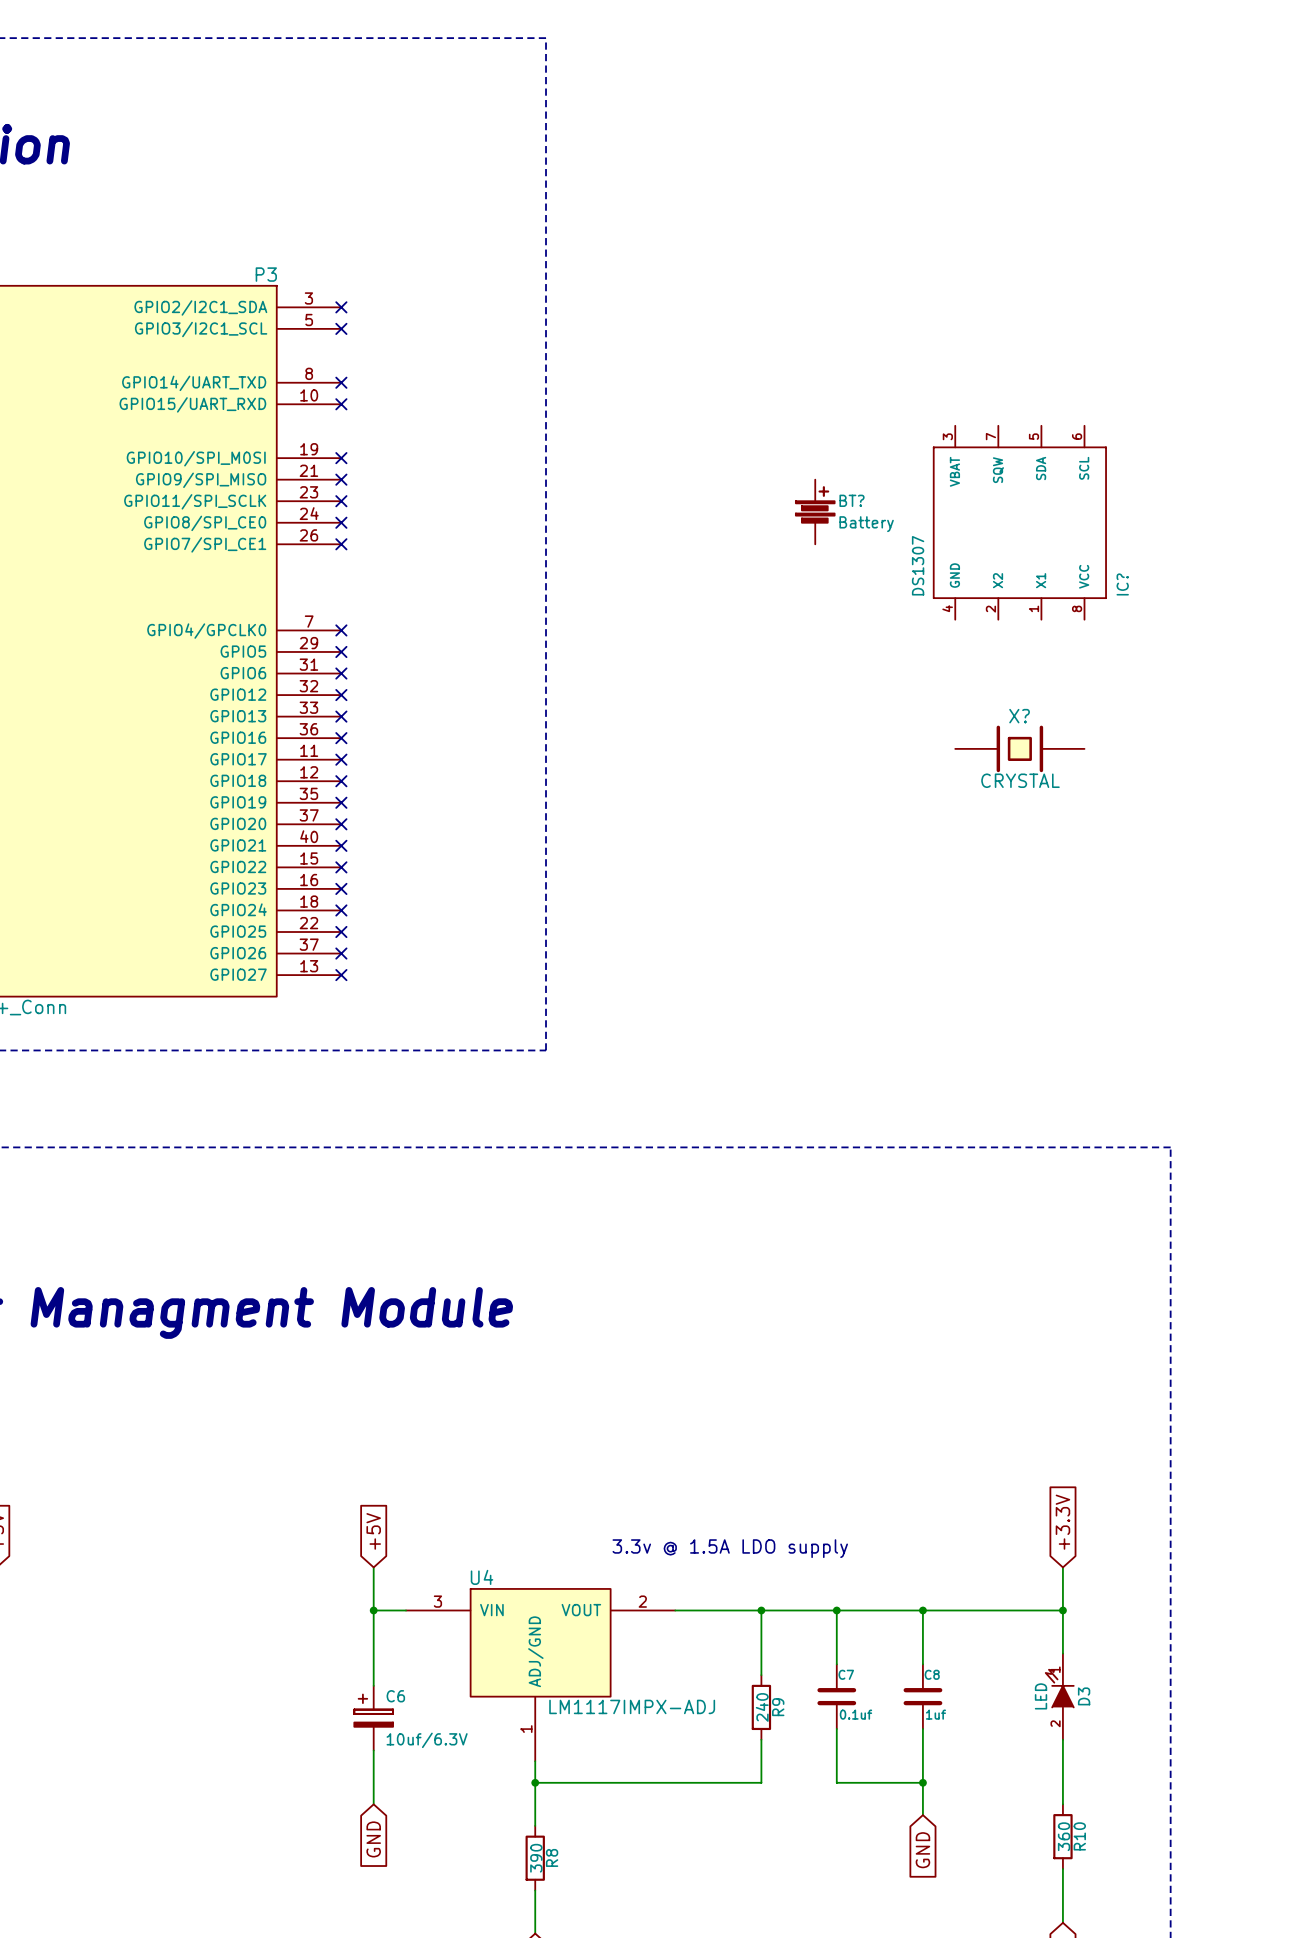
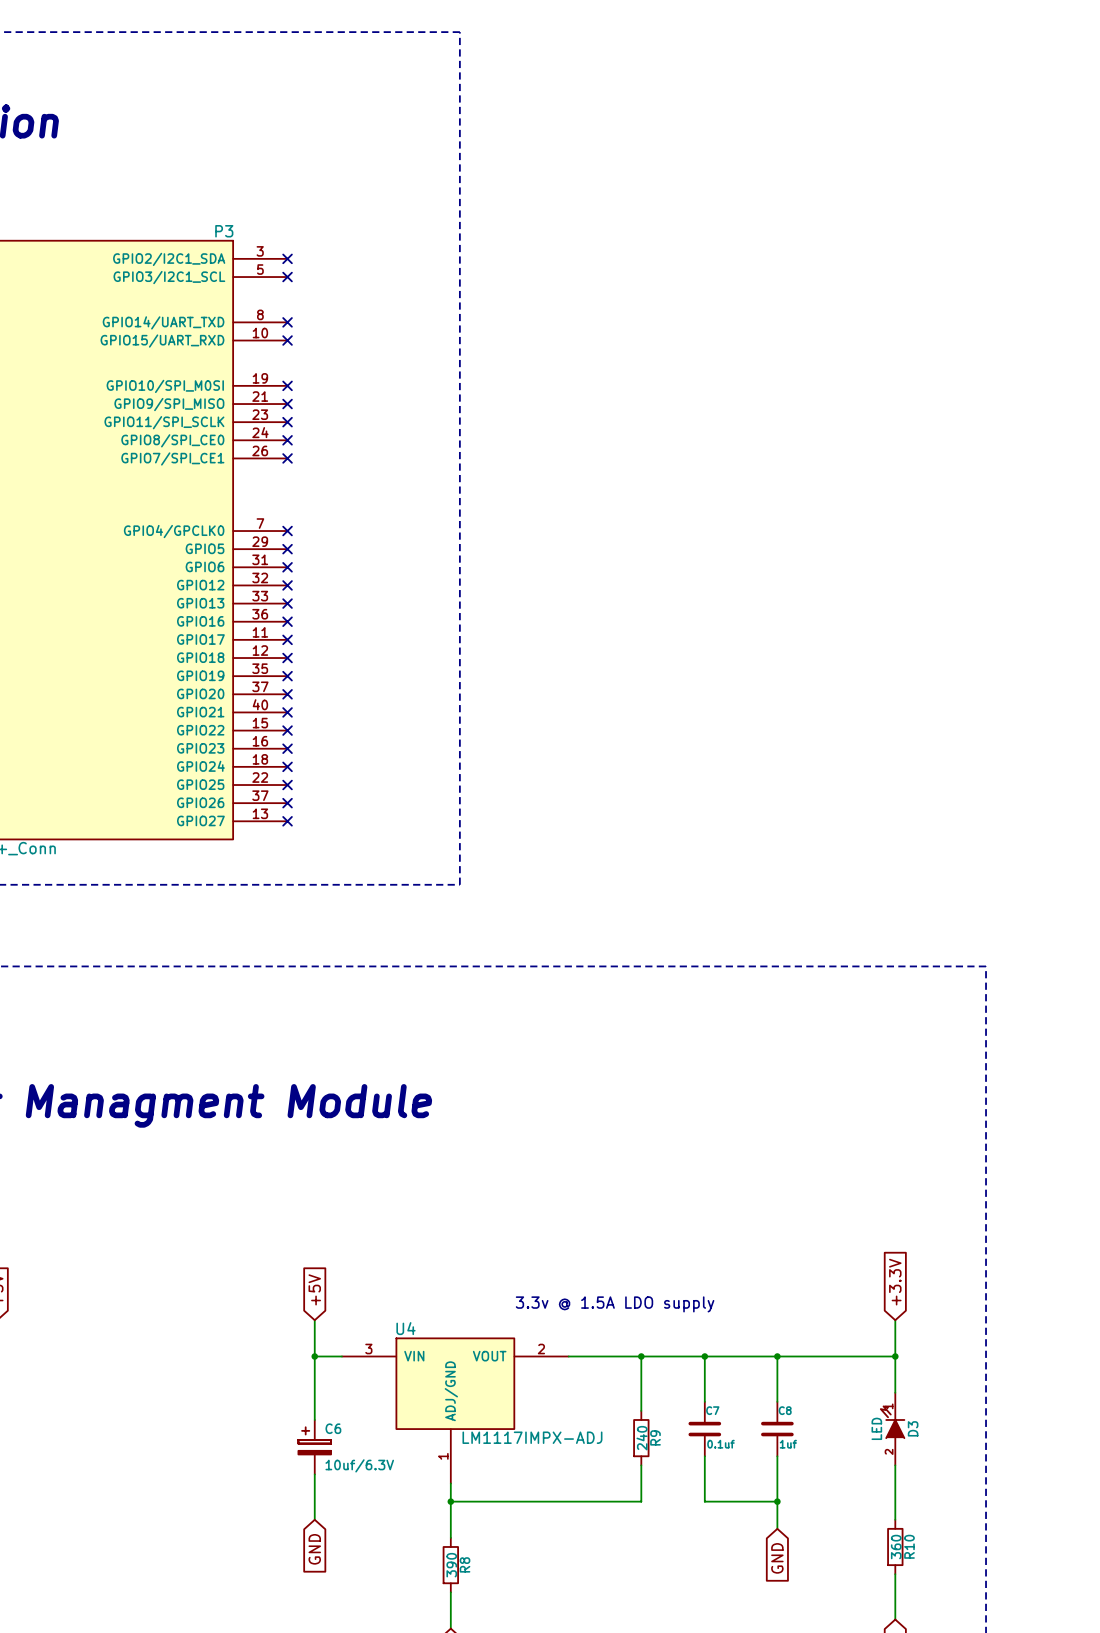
BT?: Battery (815, 511) -> none
IC?: DS1307 (1019, 522) -> none
X?: CRYSTAL (1019, 748) -> none

